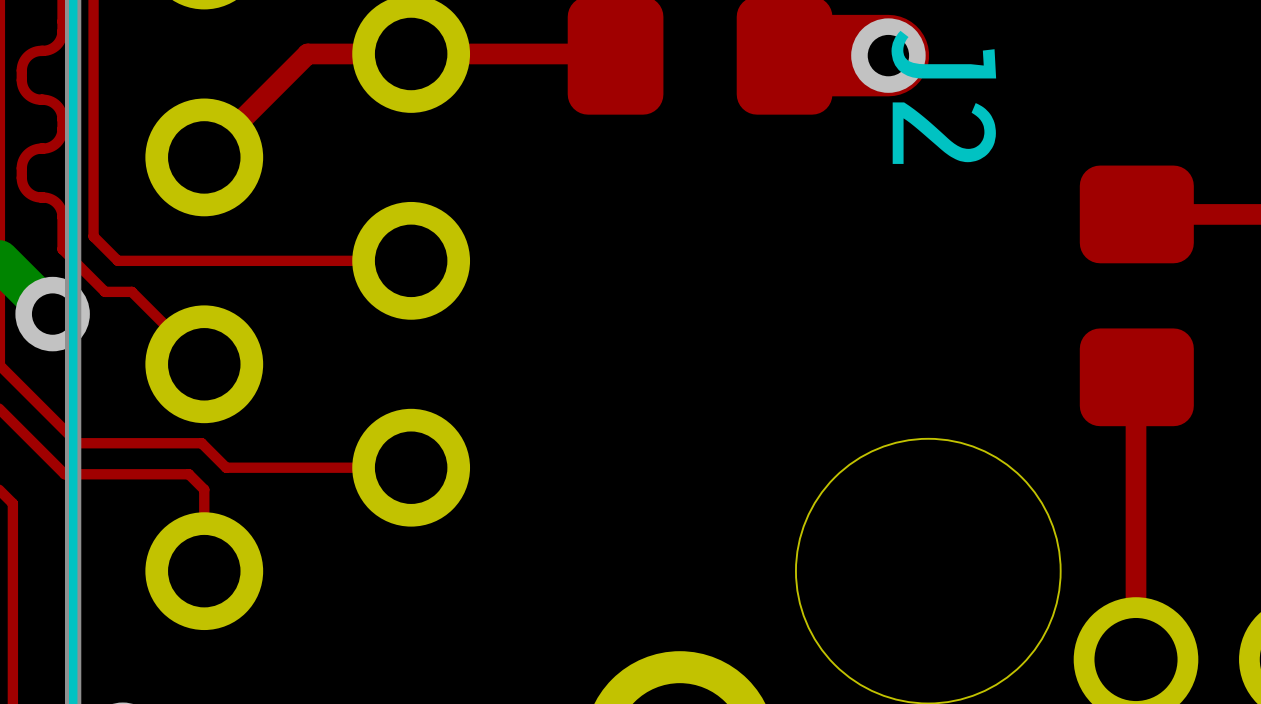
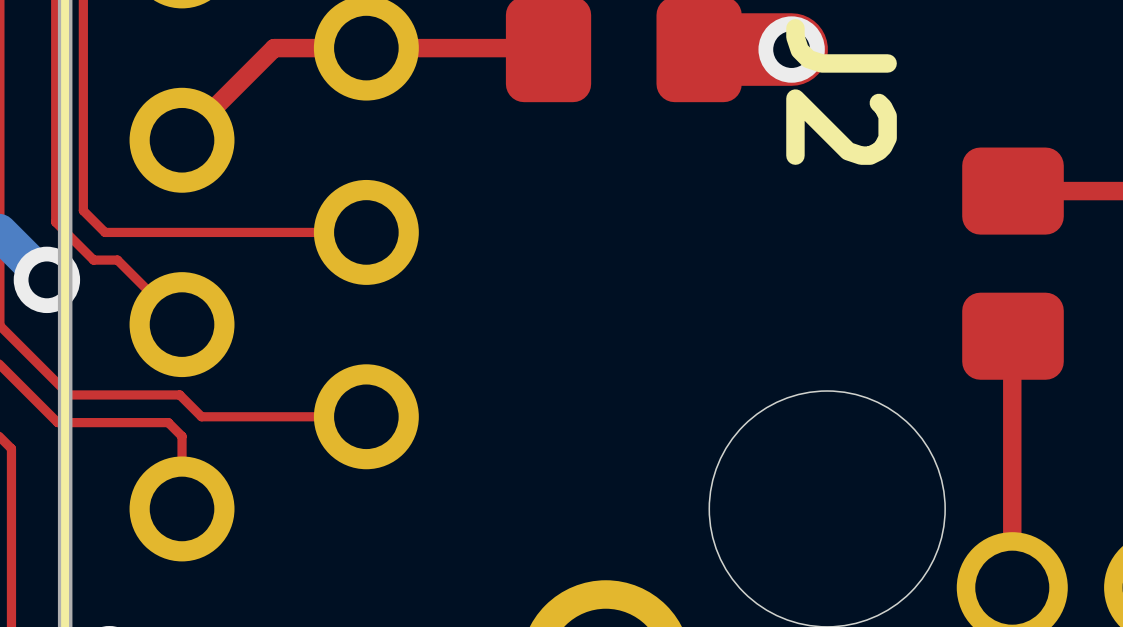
top track: (62, 31) (56, 45) (42, 50) -> (55, 27) (55, 106)
top track: (41, 50) (27, 56) (21, 70) (21, 82) (24, 90) (32, 97) (41, 99) -> none
top track: (42, 99) (56, 105) (62, 119) -> none
top track: (62, 129) (56, 142) (42, 148) -> (55, 115) (55, 193)
top track: (41, 148) (27, 154) (21, 168) (21, 180) (24, 188) (32, 195) (41, 197) -> none
top track: (42, 197) (56, 203) (62, 217) -> none

